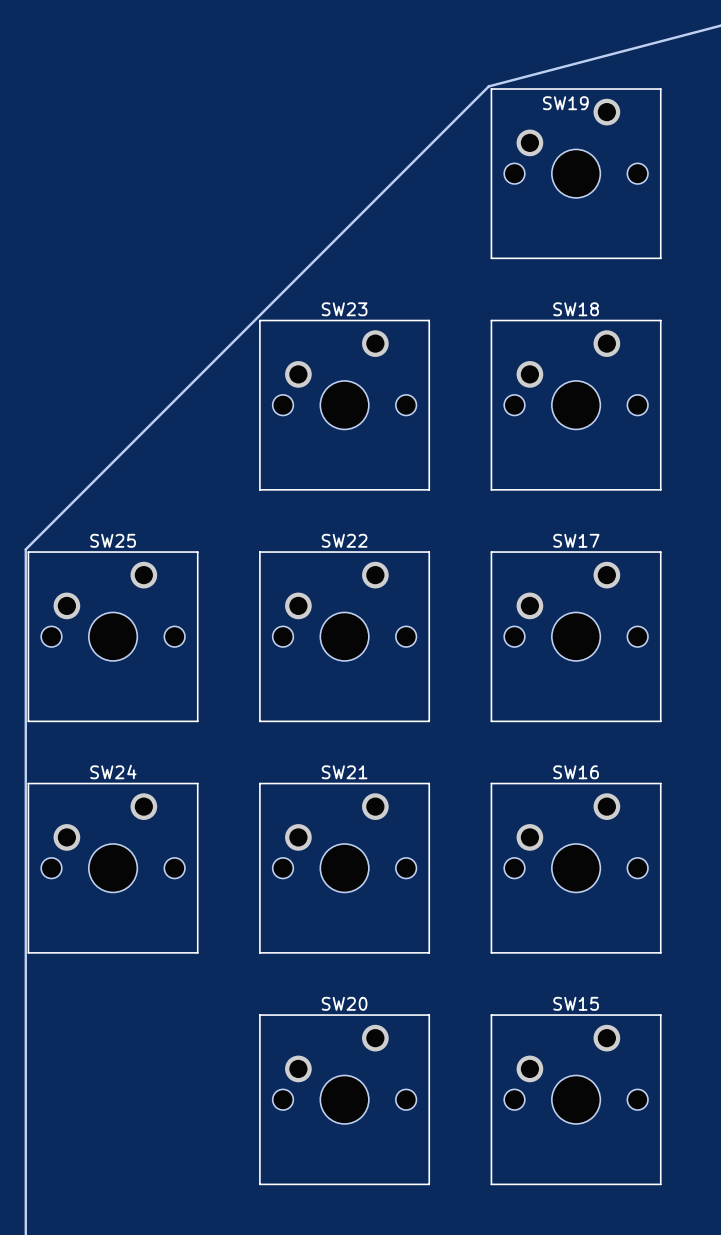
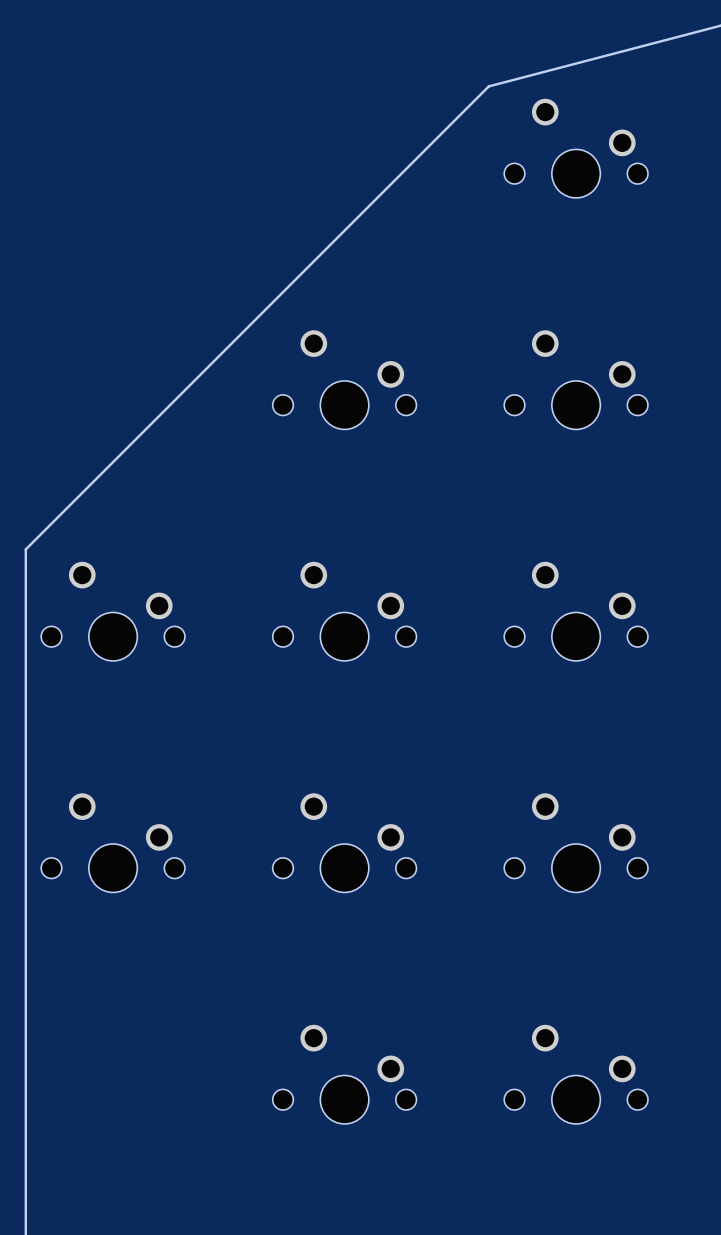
SW19 side: bottom (576, 173) -> top (576, 148)
SW23 side: bottom (344, 405) -> top (344, 379)
SW18 side: bottom (576, 405) -> top (576, 379)
SW25 side: bottom (113, 636) -> top (113, 611)
SW22 side: bottom (344, 636) -> top (344, 611)
SW17 side: bottom (576, 636) -> top (576, 611)
SW24 side: bottom (113, 868) -> top (113, 842)
SW21 side: bottom (344, 868) -> top (344, 842)
SW16 side: bottom (576, 868) -> top (576, 842)
SW20 side: bottom (344, 1099) -> top (344, 1074)
SW15 side: bottom (576, 1099) -> top (576, 1074)

